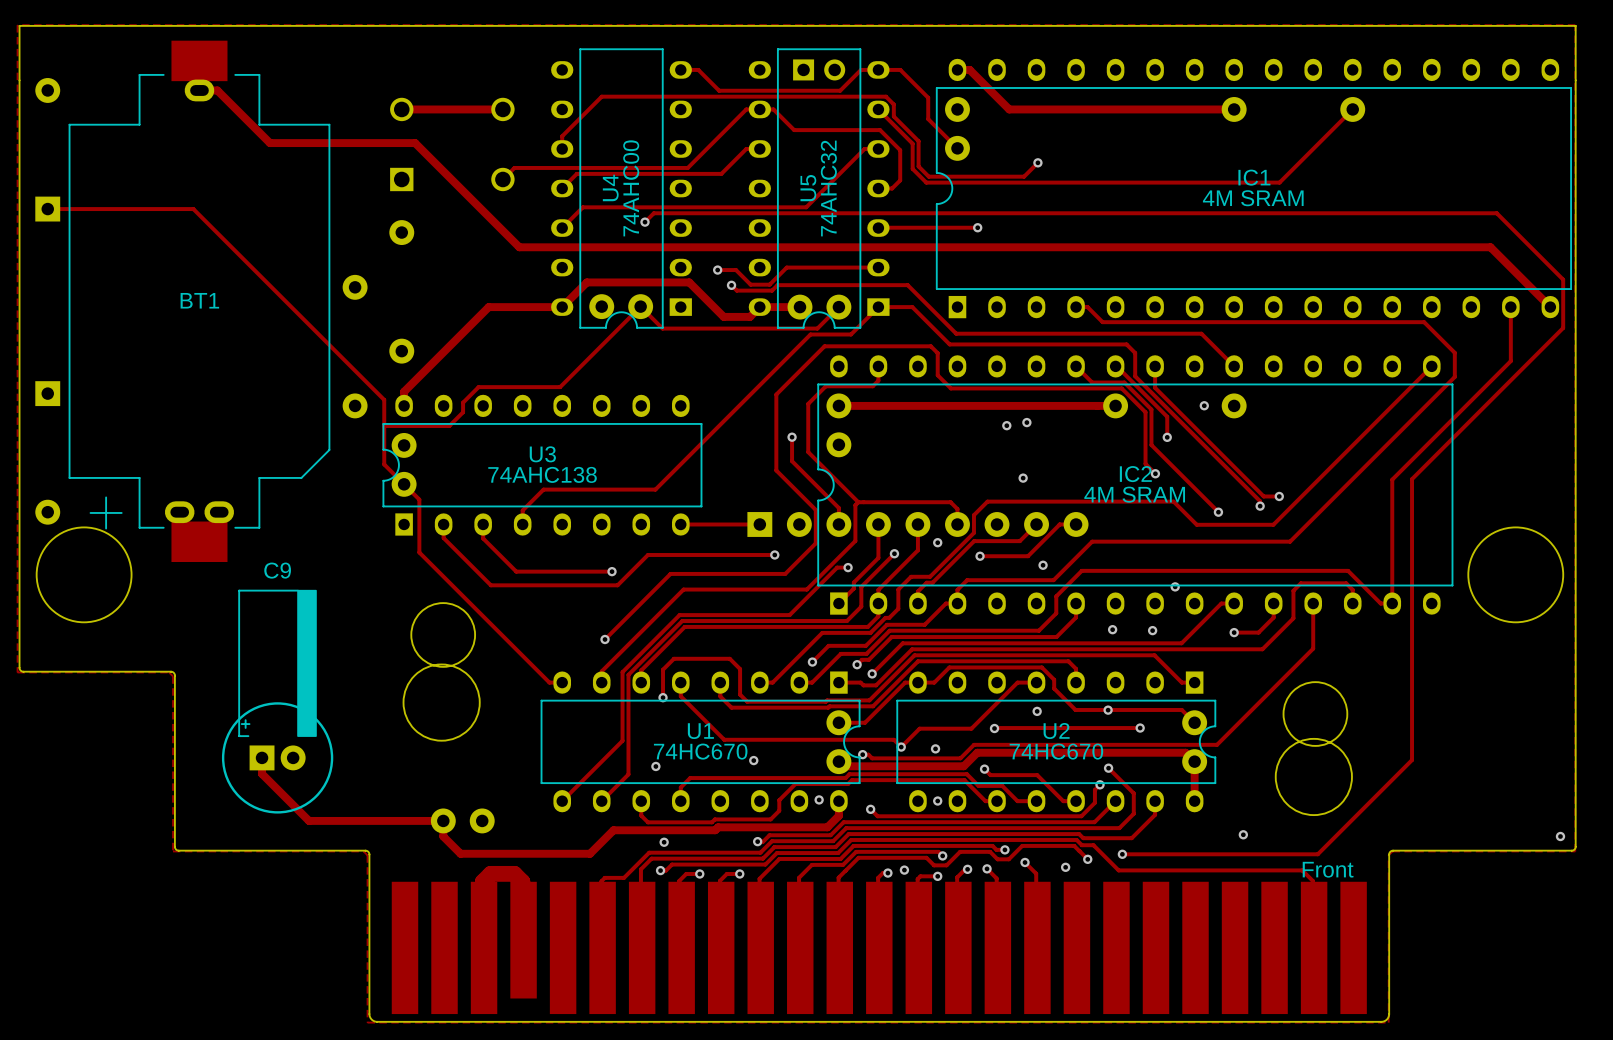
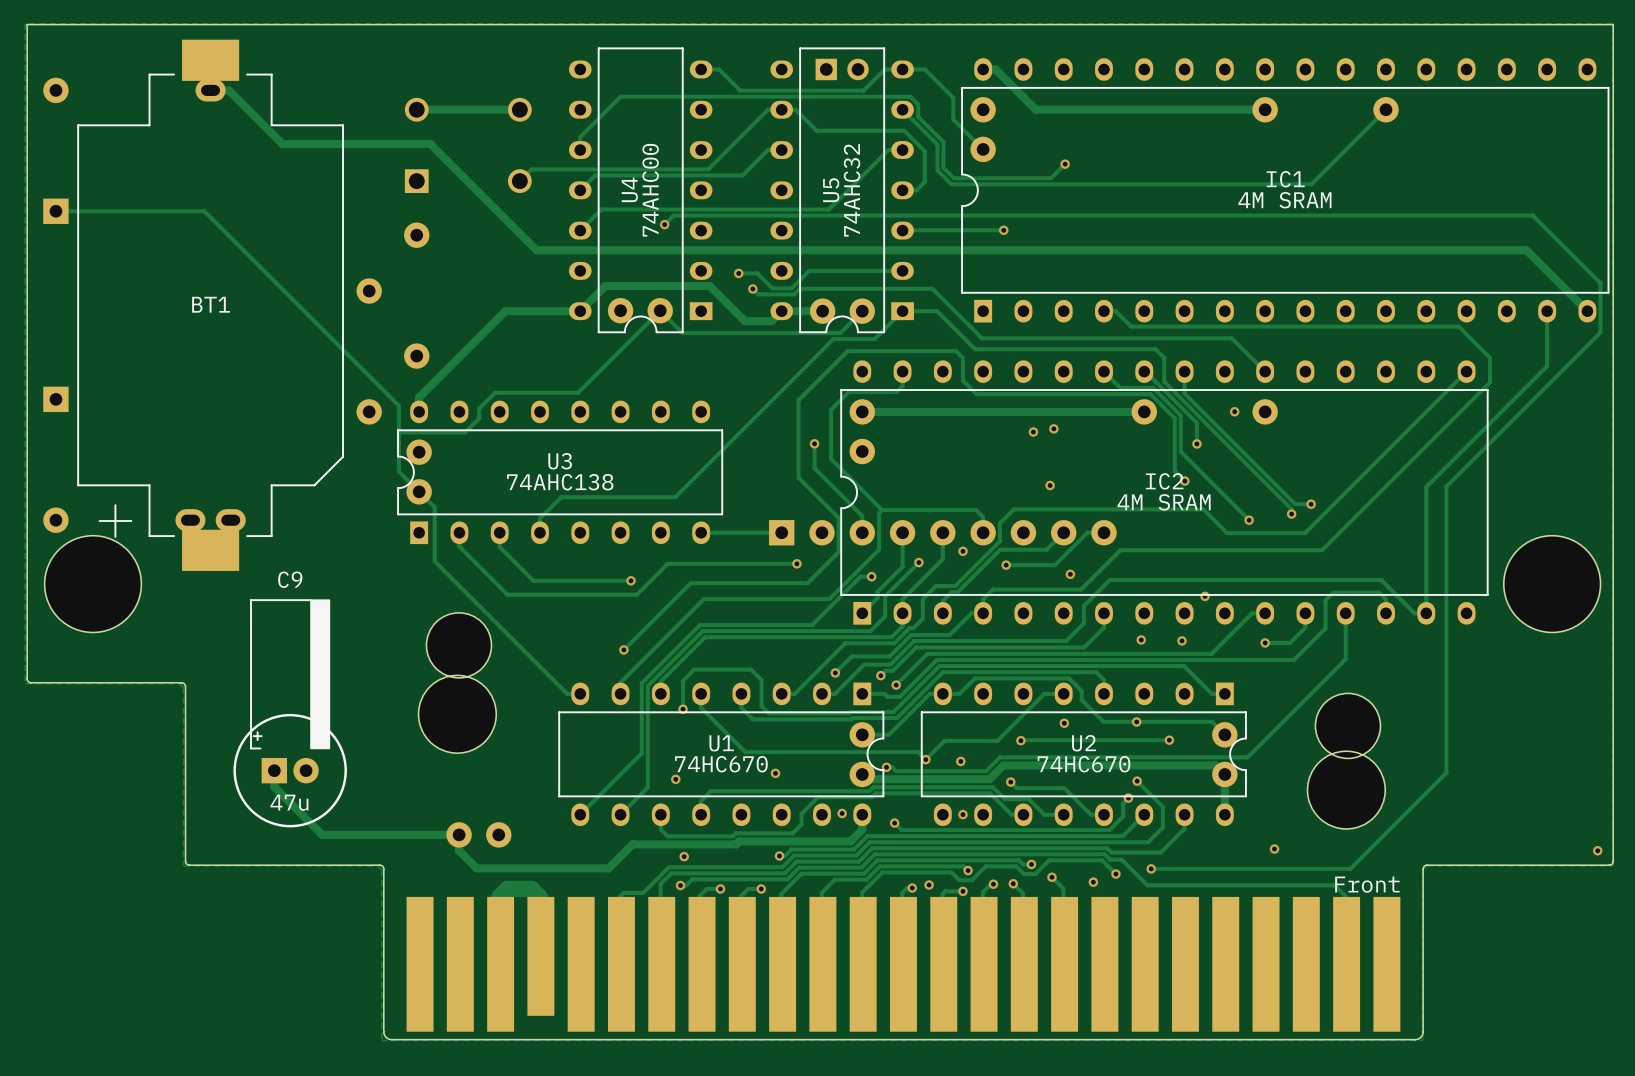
C9 value: none -> 47u (289, 802)

